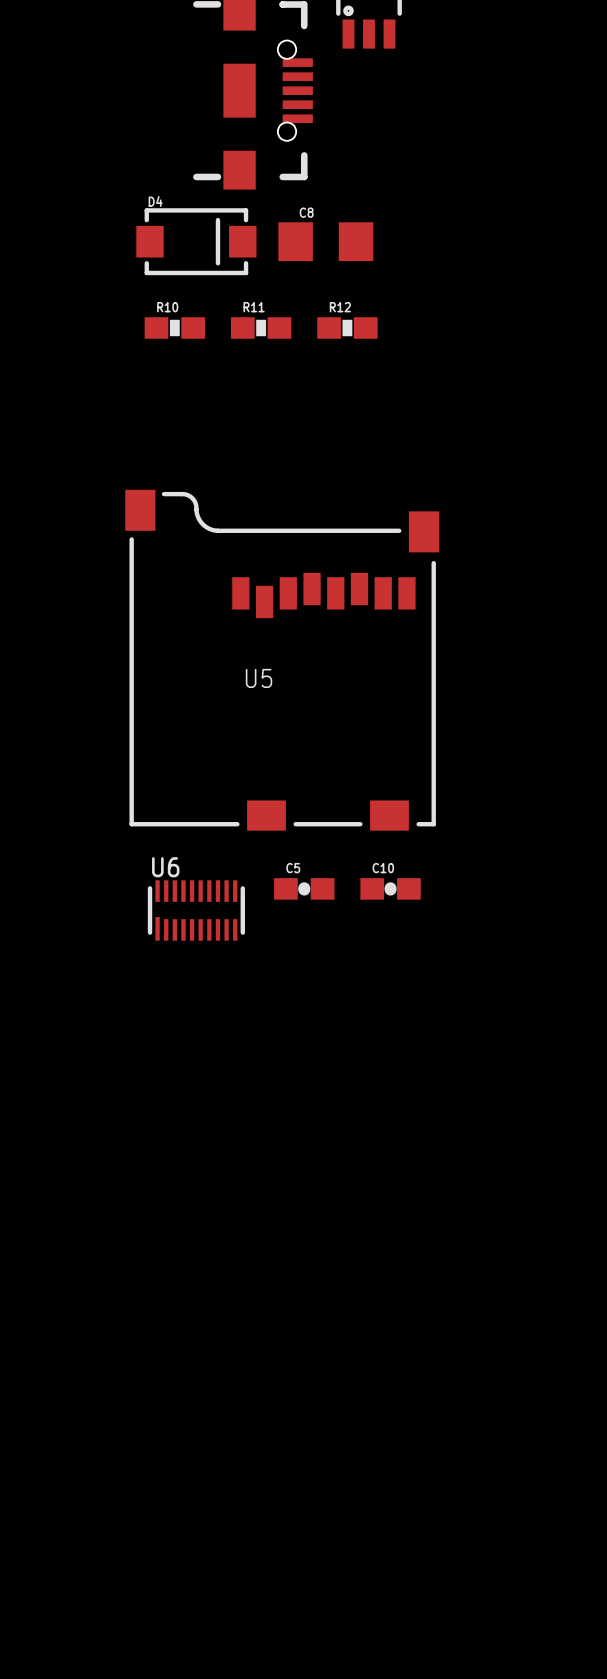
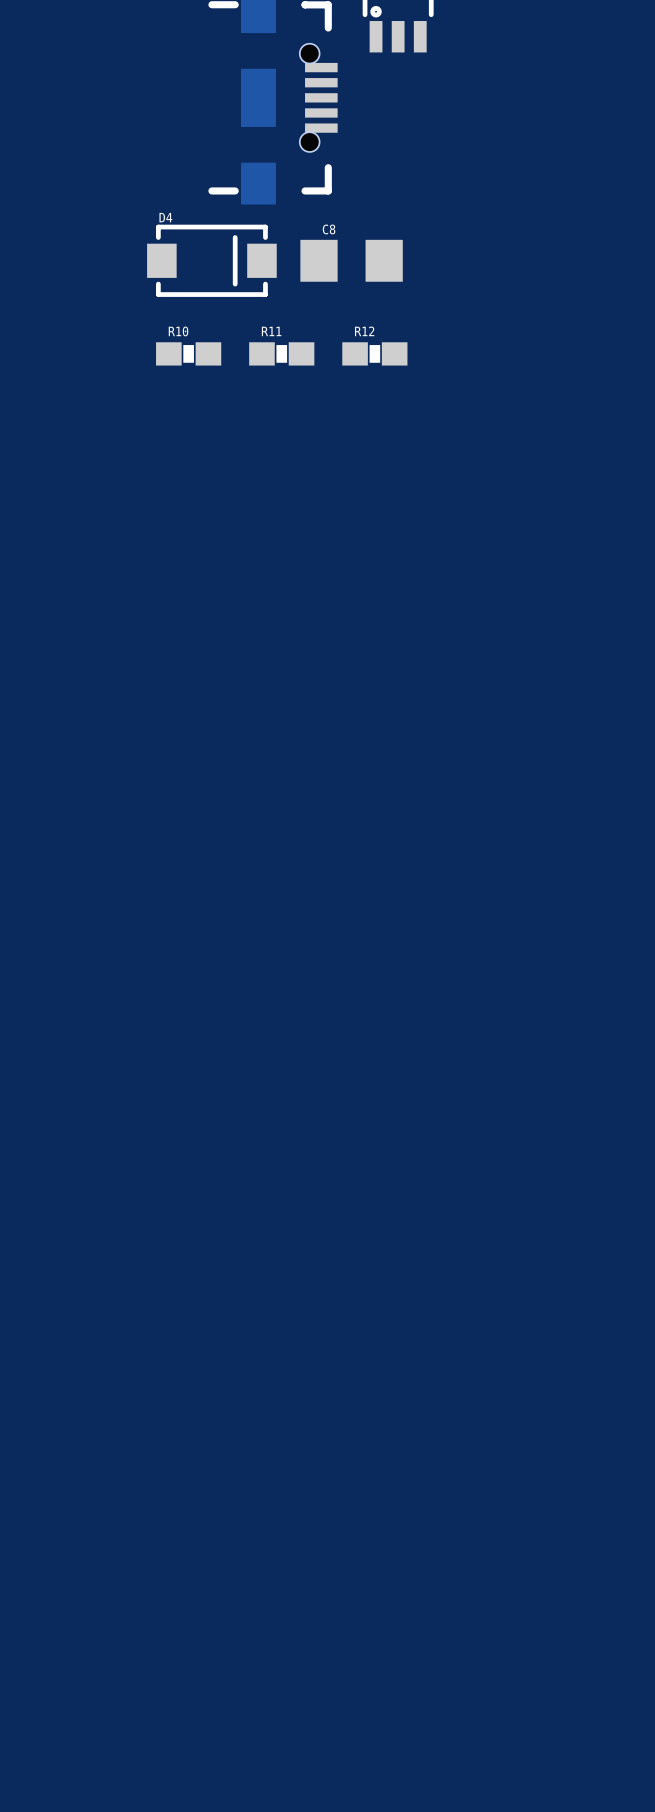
U5: (282, 660) -> none
C5: (304, 888) -> none
C10: (390, 888) -> none
U6: (196, 910) -> none

